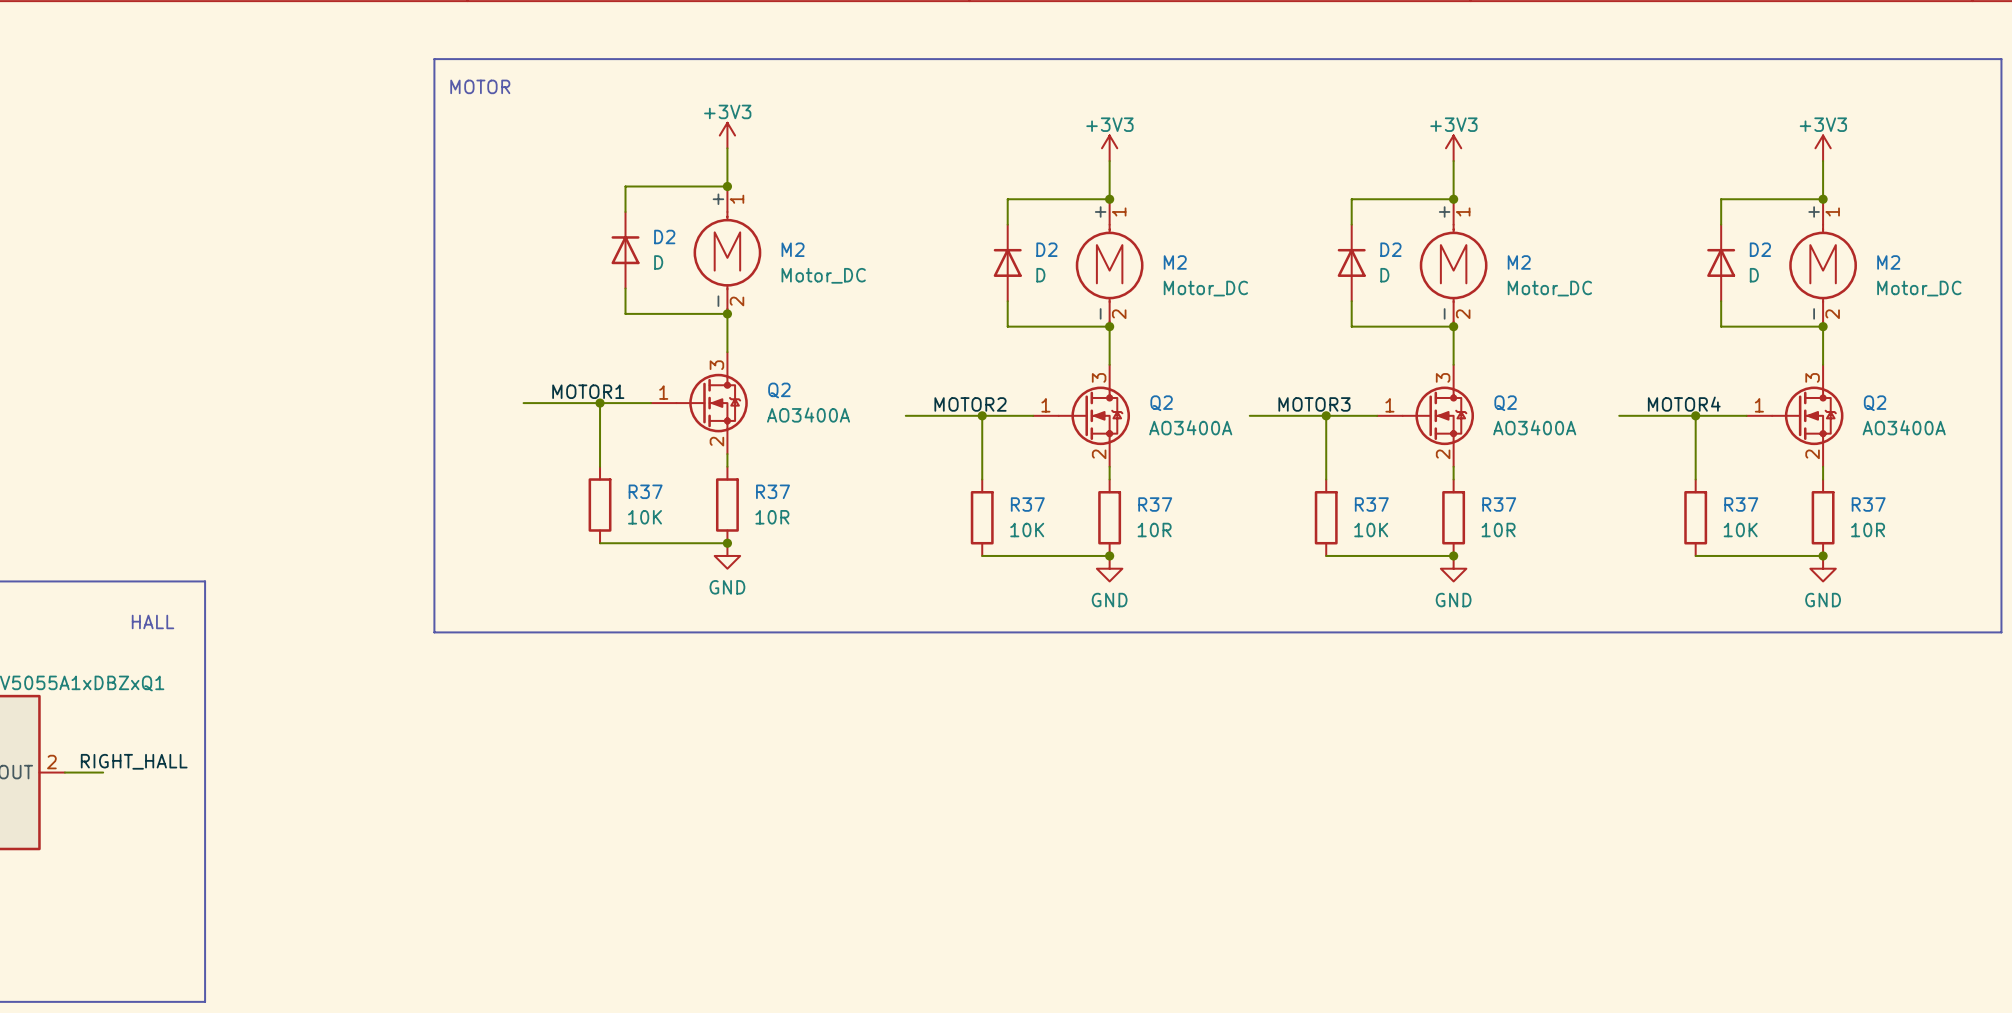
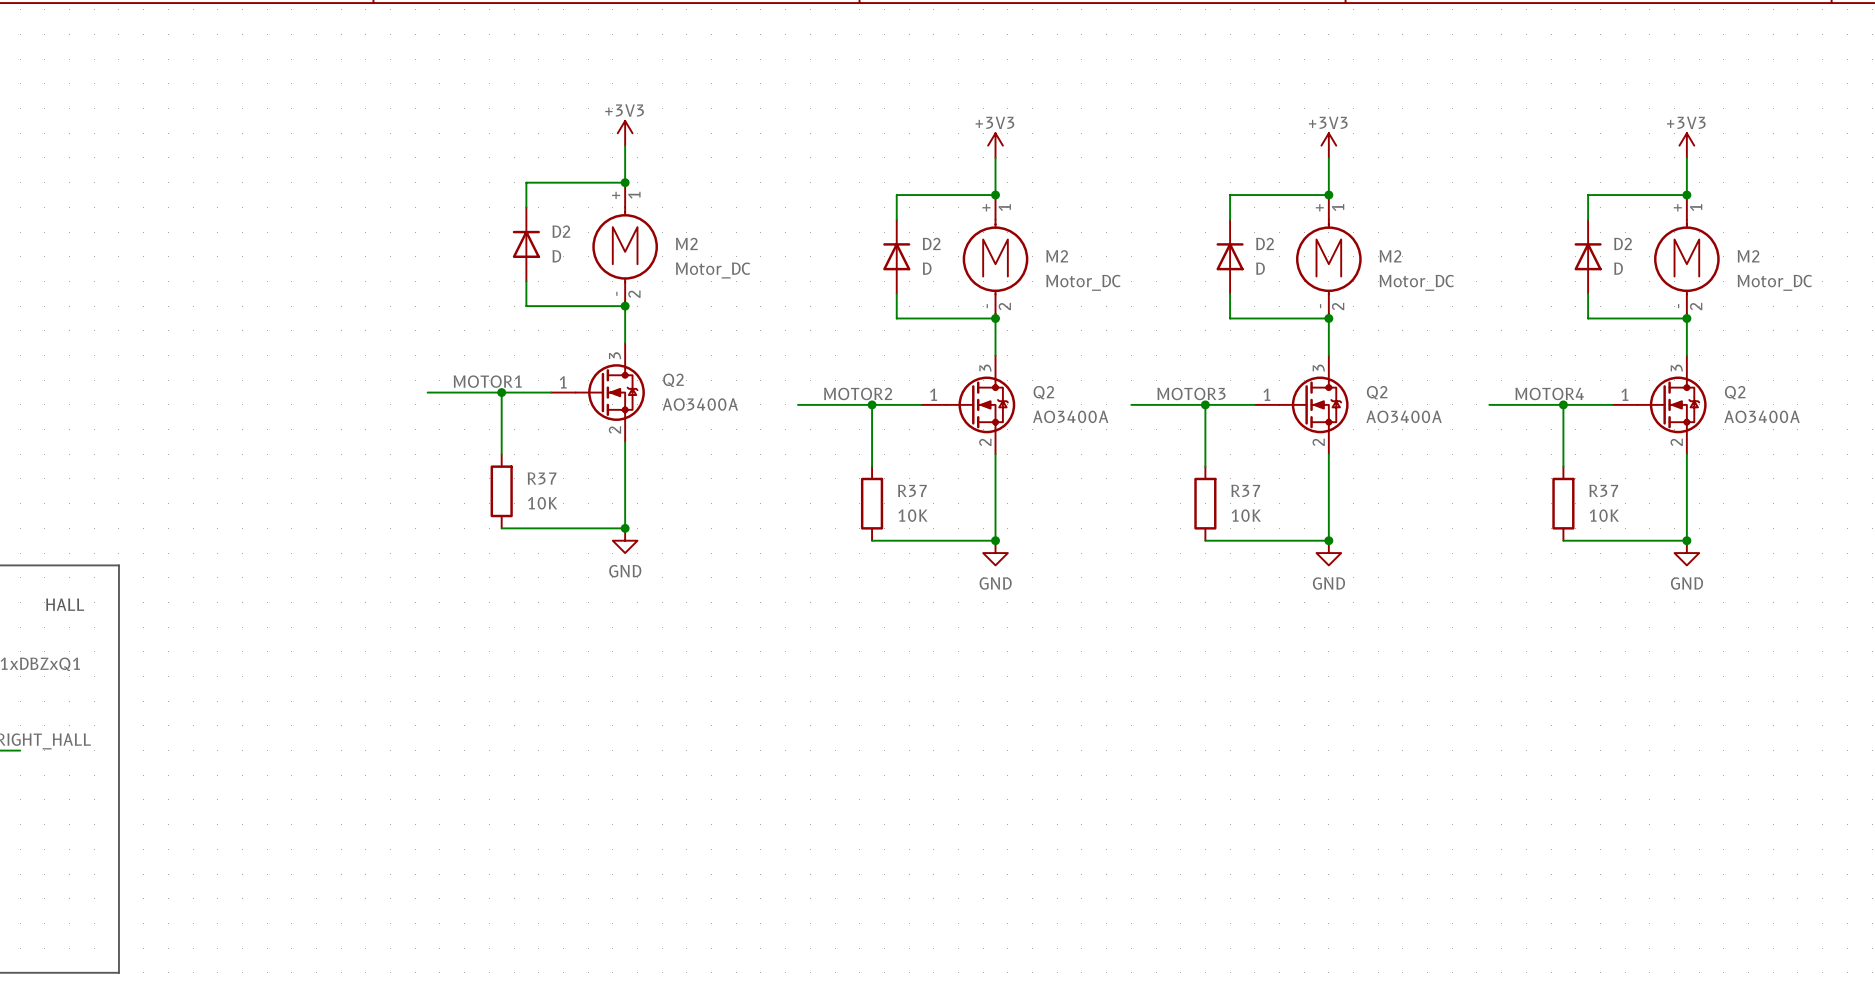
line: (434, 59) (2001, 59) (2001, 632) (434, 632) (434, 59) -> none
text: MOTOR (480, 86) -> none
wire: none -> (625, 454) (625, 528)
wire: none -> (995, 466) (995, 540)
wire: none -> (1328, 466) (1328, 540)
wire: none -> (1686, 466) (1686, 540)
R37: 10R (727, 505) -> none
R37: 10R (1109, 517) -> none
R37: 10R (1453, 517) -> none
R37: 10R (1823, 517) -> none

